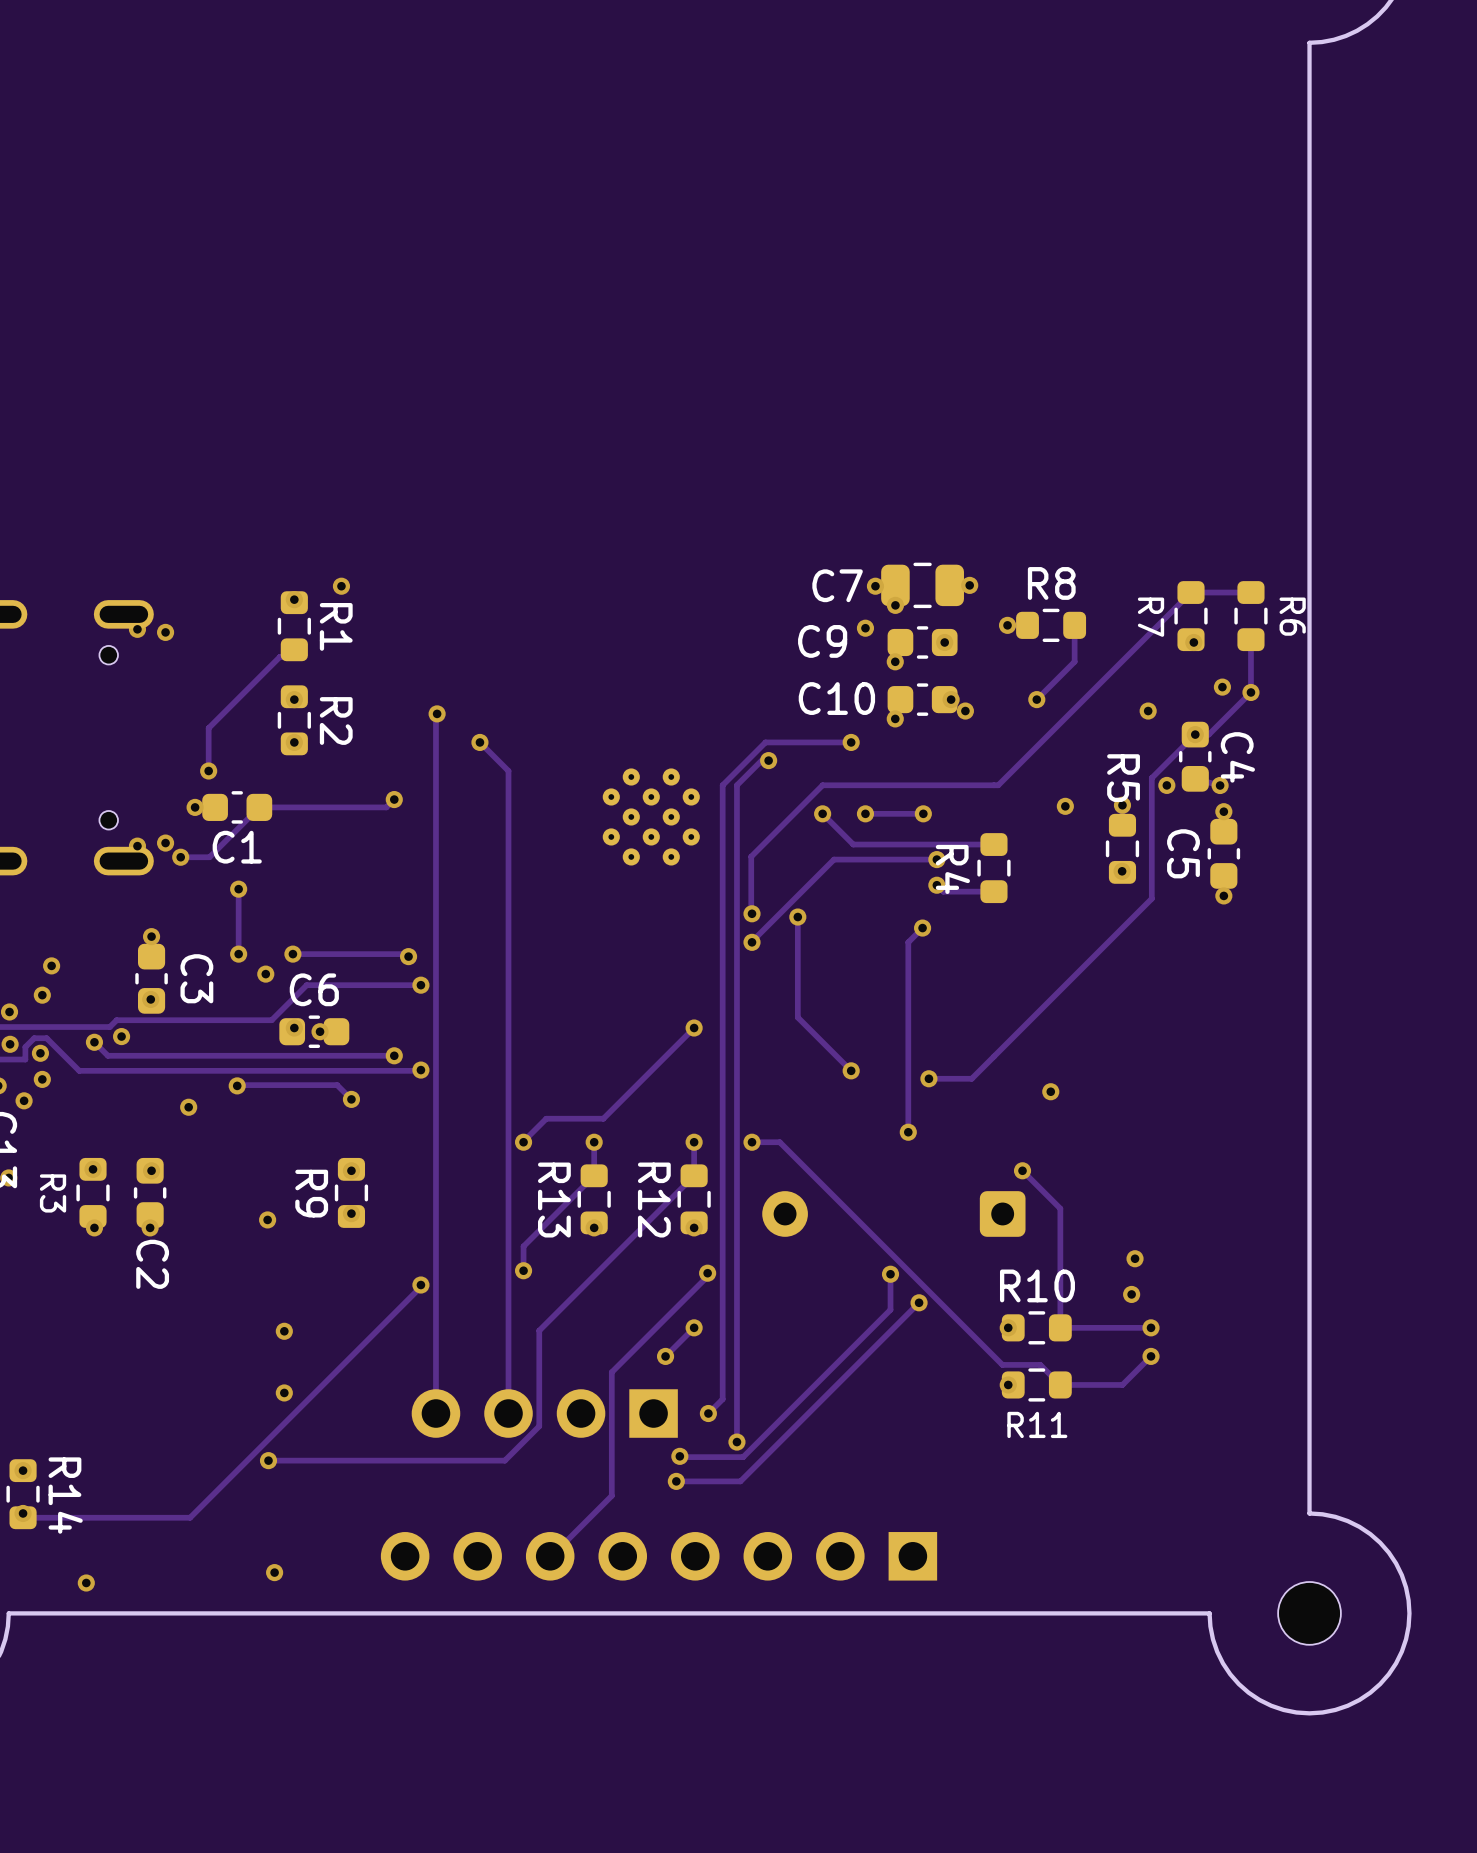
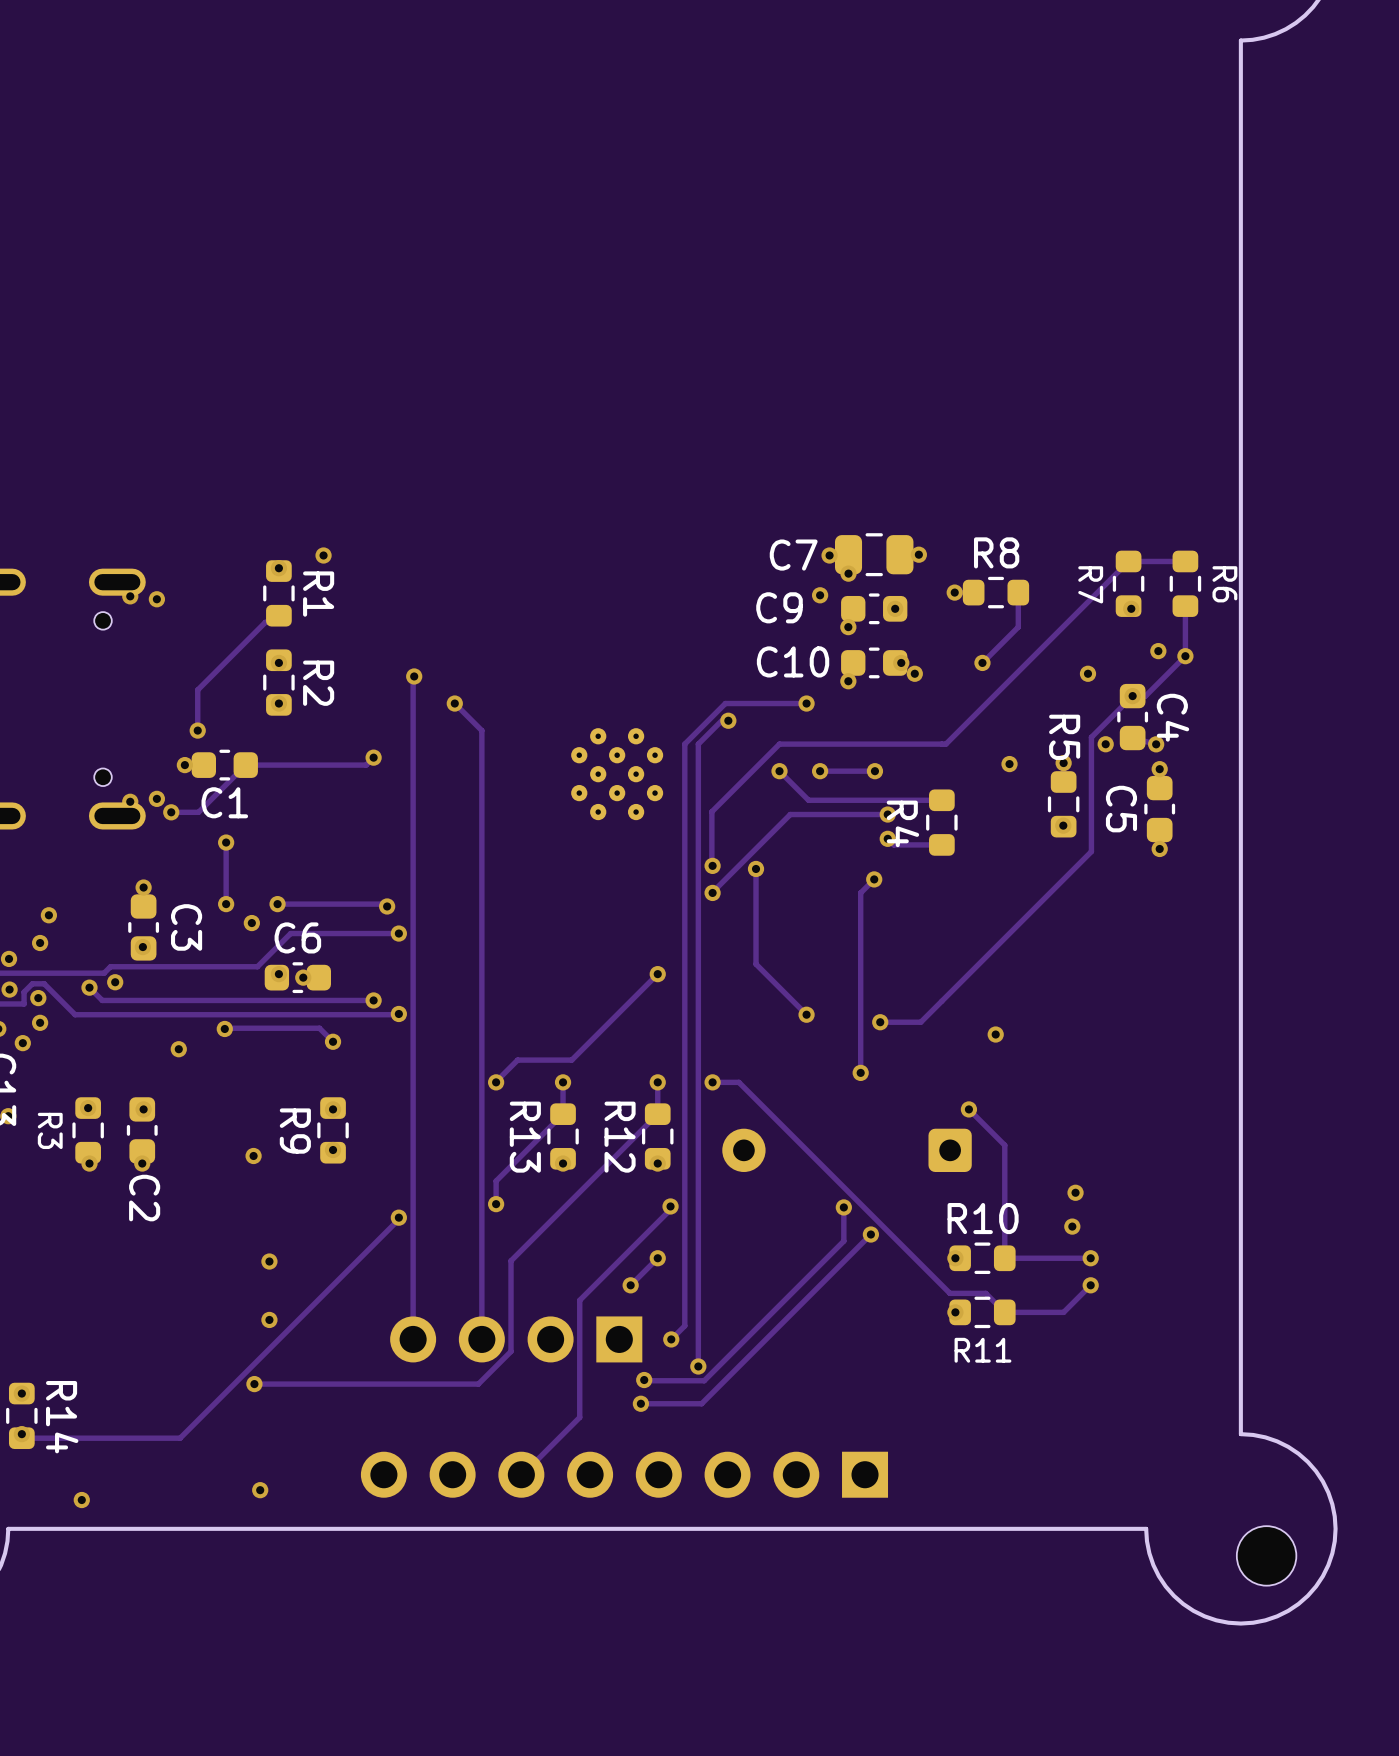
part position: (1309, 1613) -> (1266, 1555)

